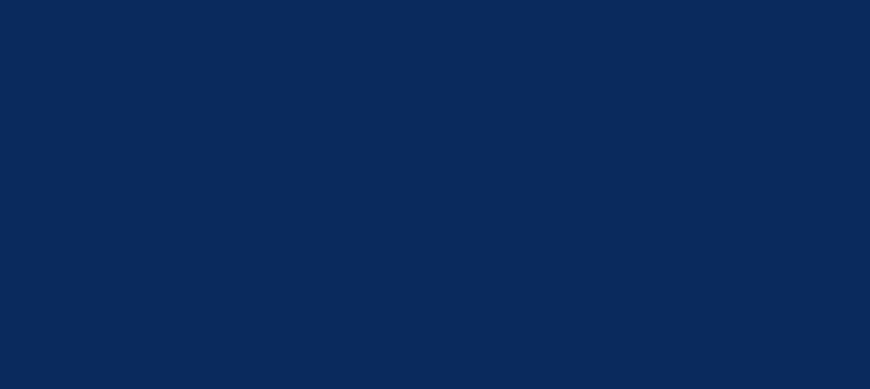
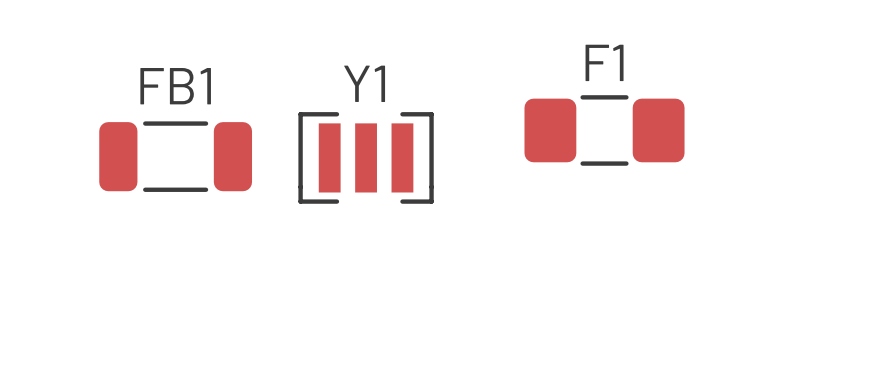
F1: none -> (604, 130)
FB1: none -> (175, 156)
Y1: none -> (366, 157)

